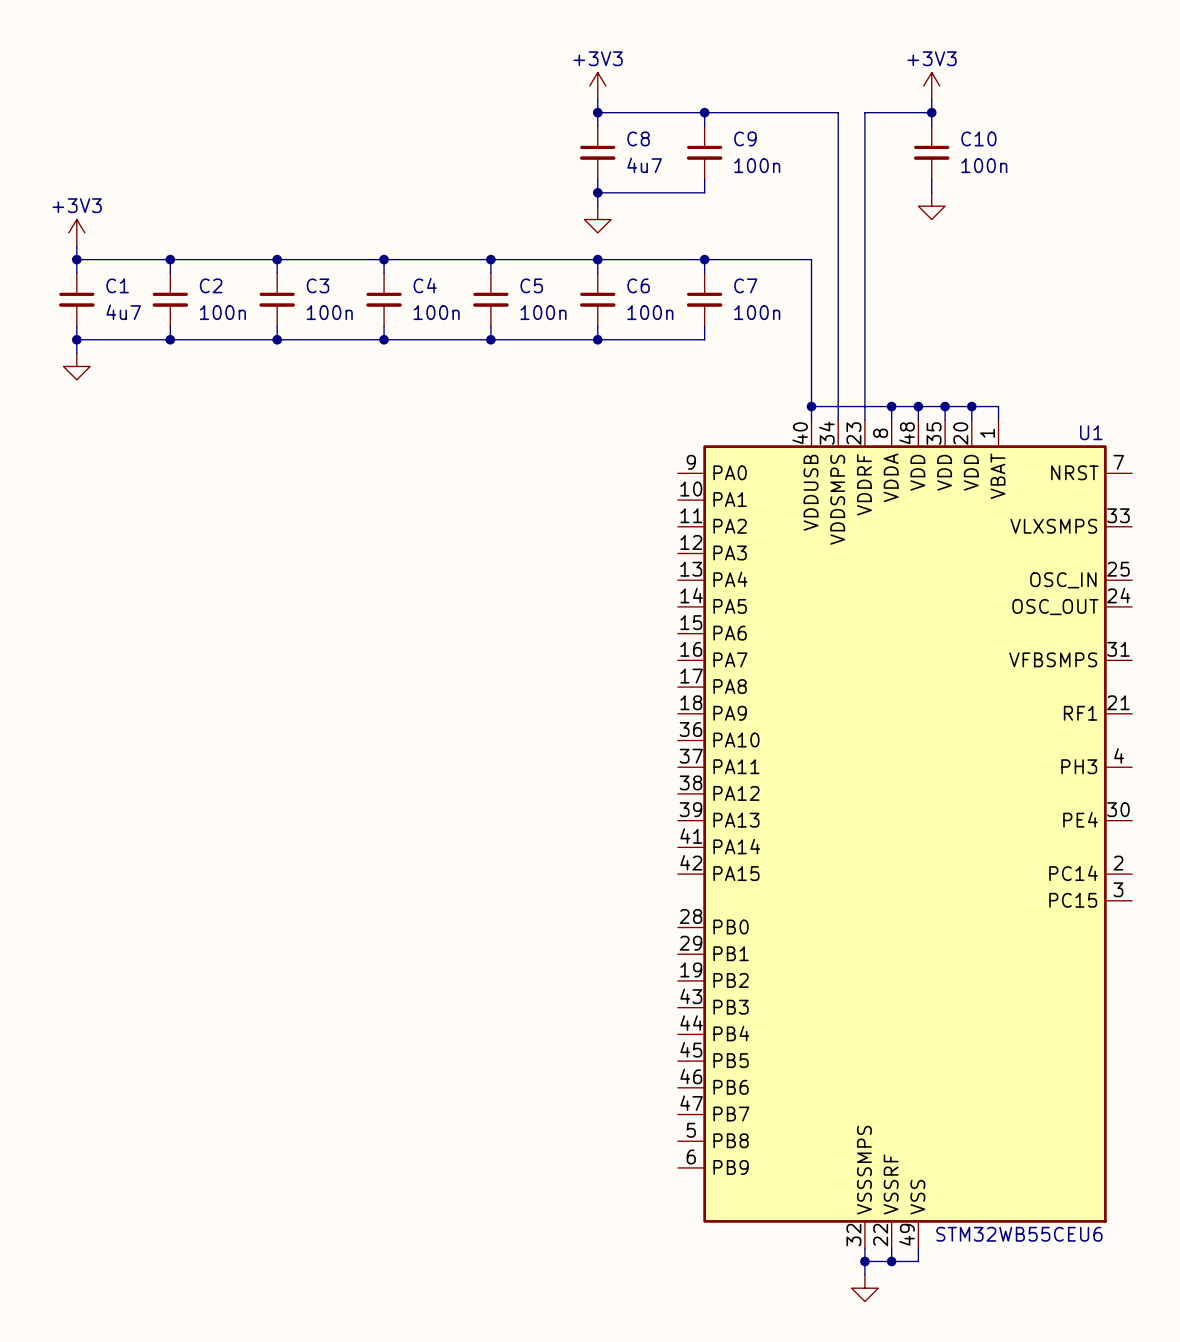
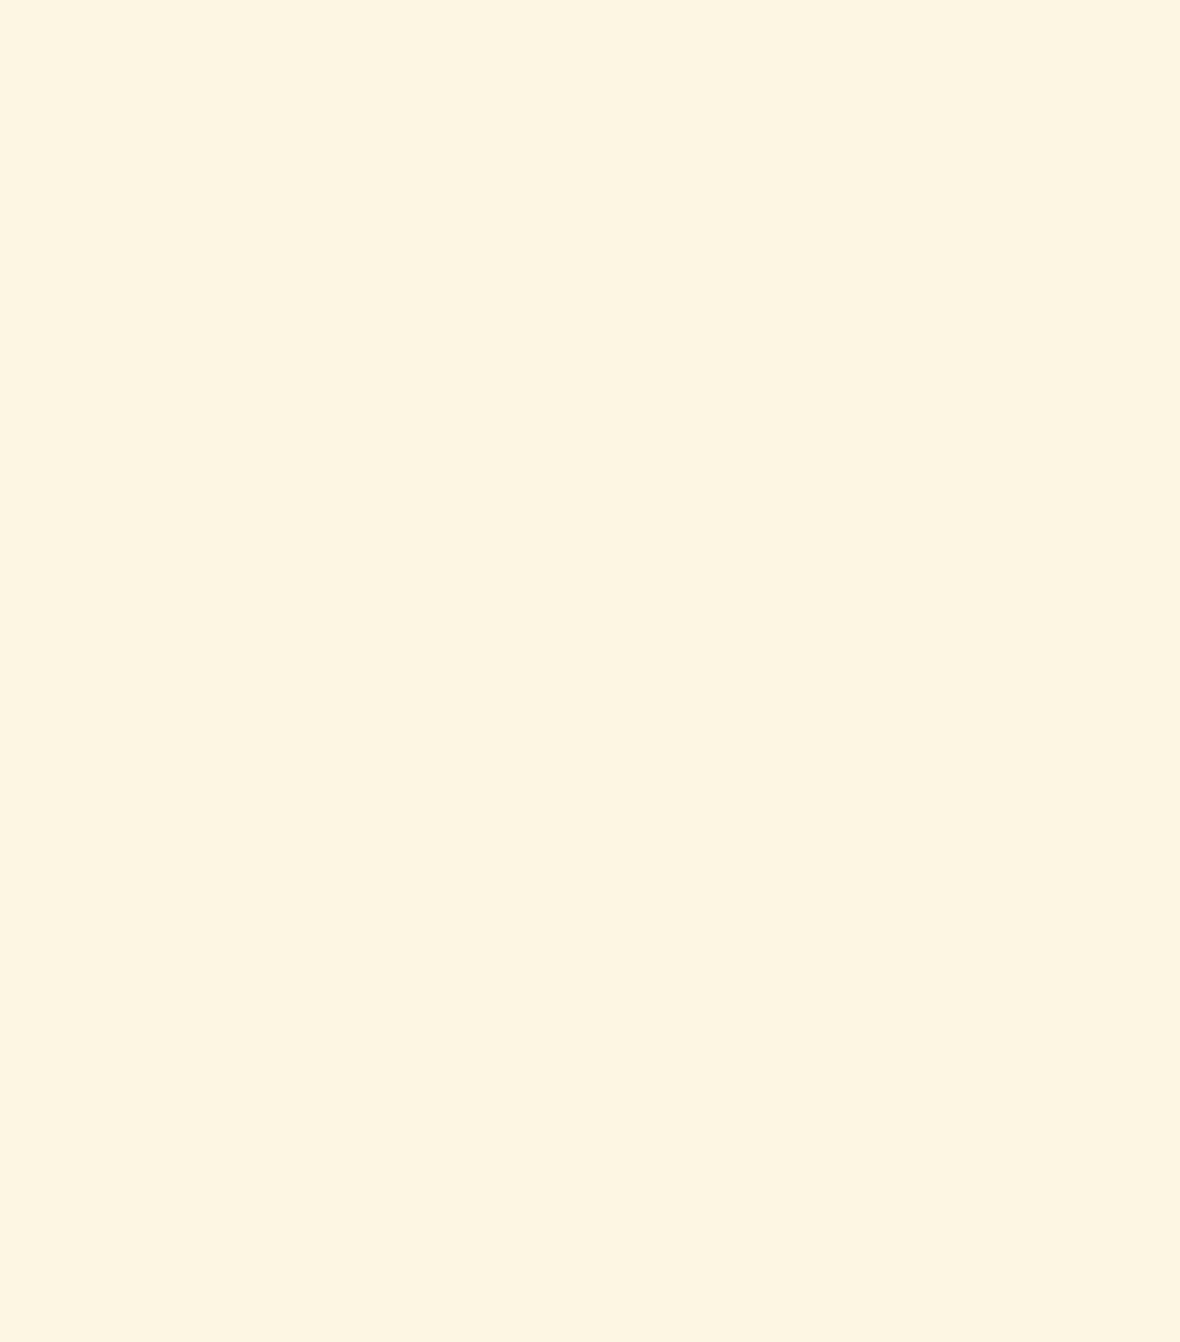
power symbol: +3V3 (597, 85) -> none
power symbol: +3V3 (931, 85) -> none
wire: (597, 99) (597, 126) -> none
wire: (931, 99) (931, 126) -> none
wire: (597, 112) (838, 112) (838, 419) -> none
junction: (597, 112) -> none
wire: (704, 112) (704, 126) -> none
junction: (704, 112) -> none
wire: (931, 112) (864, 112) (864, 419) -> none
junction: (931, 112) -> none
C8: 4u7 (597, 152) -> none
C9: 100n (704, 152) -> none
C10: 100n (931, 152) -> none
wire: (597, 179) (597, 206) -> none
wire: (704, 179) (704, 192) (597, 192) -> none
wire: (931, 179) (931, 192) -> none
junction: (597, 192) -> none
power symbol: (931, 206) -> none
power symbol: (597, 219) -> none
power symbol: +3V3 (76, 232) -> none
wire: (76, 246) (76, 272) -> none
wire: (76, 259) (811, 259) (811, 419) -> none
junction: (76, 259) -> none
wire: (170, 259) (170, 272) -> none
junction: (170, 259) -> none
wire: (277, 259) (277, 272) -> none
junction: (277, 259) -> none
wire: (384, 259) (384, 272) -> none
junction: (384, 259) -> none
wire: (490, 259) (490, 272) -> none
junction: (490, 259) -> none
wire: (597, 259) (597, 272) -> none
junction: (597, 259) -> none
wire: (704, 259) (704, 272) -> none
junction: (704, 259) -> none
C1: 4u7 (76, 299) -> none
C2: 100n (170, 299) -> none
C3: 100n (277, 299) -> none
C4: 100n (384, 299) -> none
C5: 100n (490, 299) -> none
C6: 100n (597, 299) -> none
C7: 100n (704, 299) -> none
wire: (76, 326) (76, 353) -> none
wire: (170, 326) (170, 339) -> none
wire: (277, 326) (277, 339) -> none
wire: (384, 326) (384, 339) -> none
wire: (490, 326) (490, 339) -> none
wire: (597, 326) (597, 339) -> none
wire: (704, 326) (704, 339) (76, 339) -> none
junction: (76, 339) -> none
junction: (170, 339) -> none
junction: (277, 339) -> none
junction: (384, 339) -> none
junction: (490, 339) -> none
junction: (597, 339) -> none
power symbol: (76, 366) -> none
wire: (811, 406) (998, 406) (998, 419) -> none
junction: (811, 406) -> none
wire: (891, 406) (891, 419) -> none
junction: (891, 406) -> none
wire: (918, 406) (918, 419) -> none
junction: (918, 406) -> none
wire: (945, 406) (945, 419) -> none
junction: (945, 406) -> none
wire: (971, 406) (971, 419) -> none
junction: (971, 406) -> none
U1: STM32WB55CEU6 (905, 834) -> none
wire: (864, 1248) (864, 1274) -> none
wire: (891, 1248) (891, 1261) -> none
wire: (918, 1248) (918, 1261) (864, 1261) -> none
junction: (864, 1261) -> none
junction: (891, 1261) -> none
power symbol: (864, 1288) -> none

